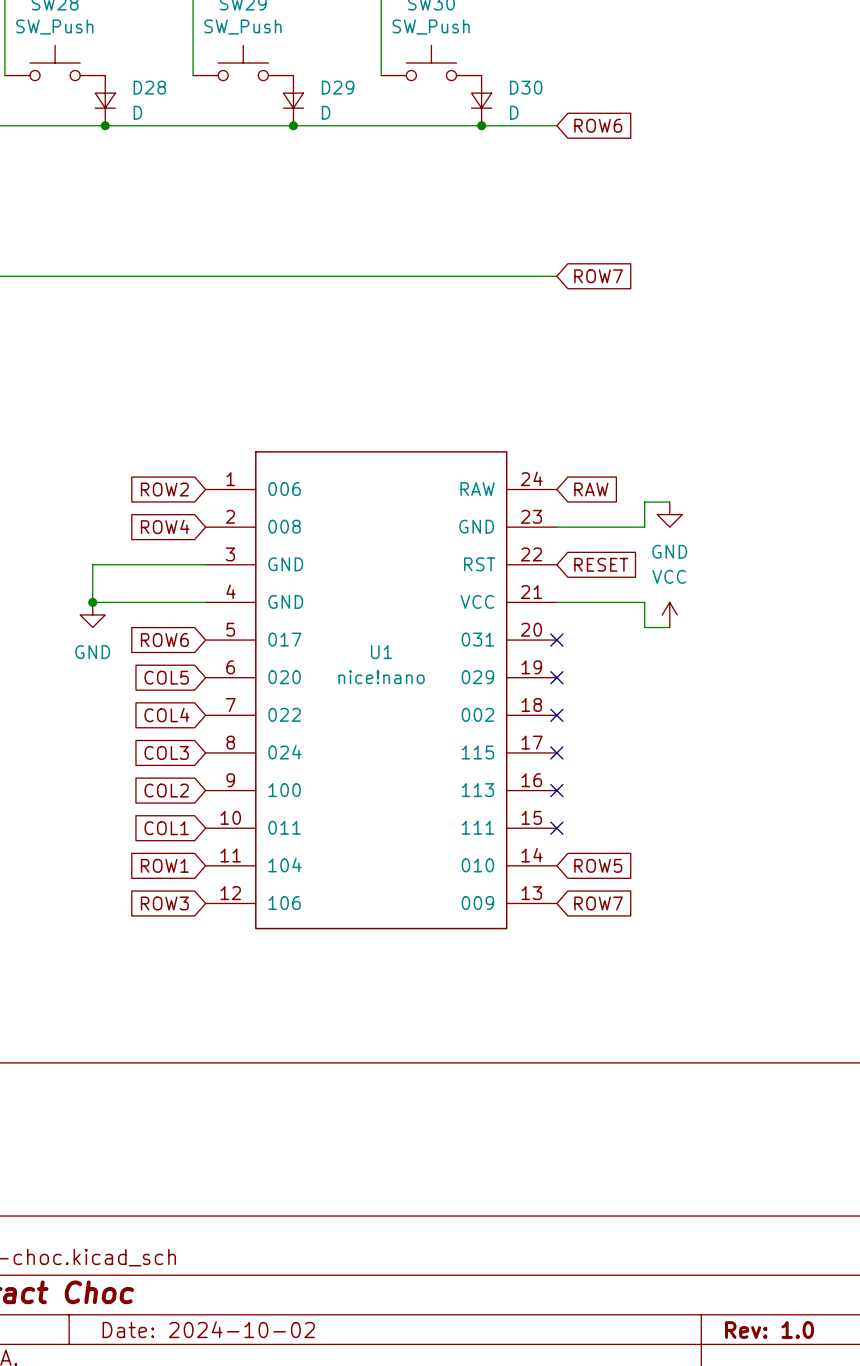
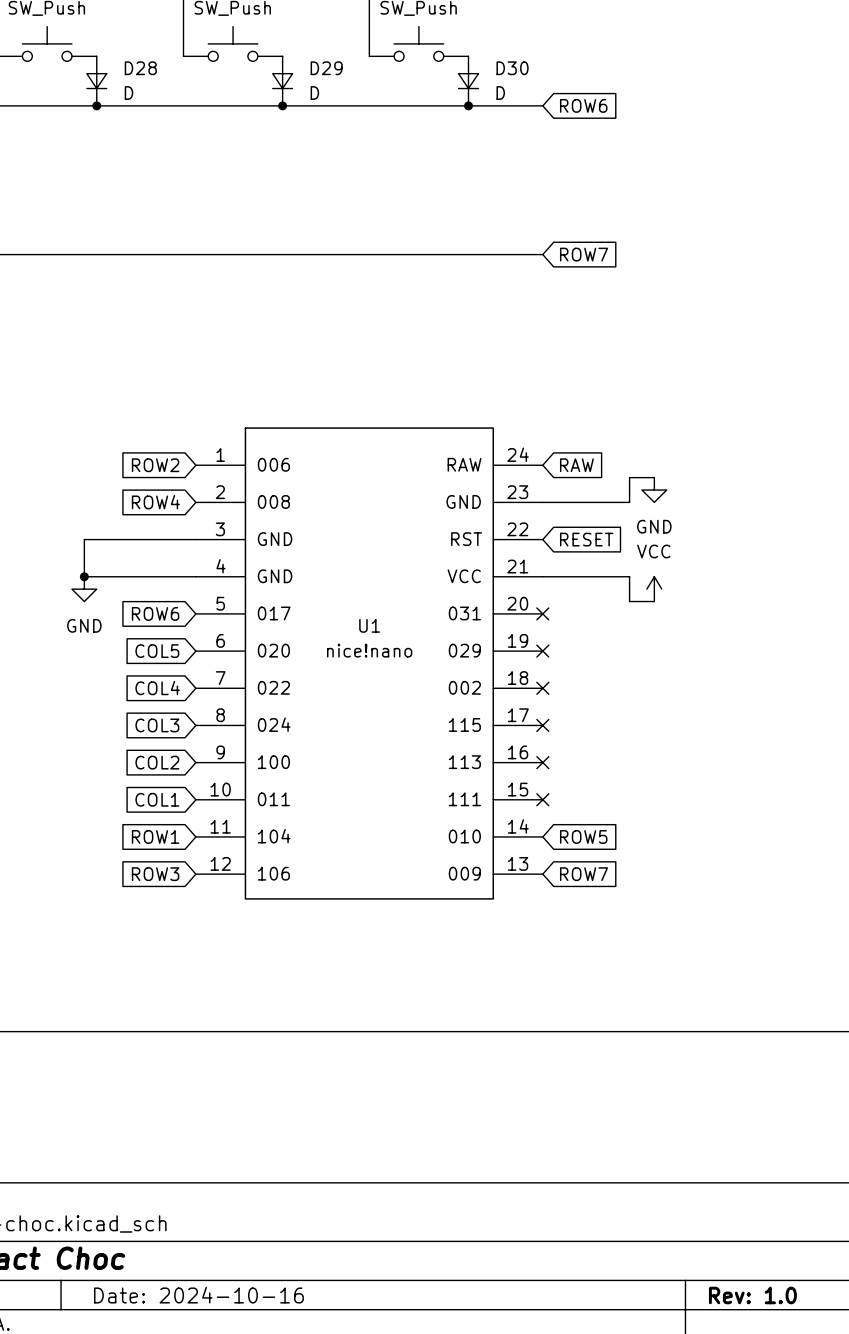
title block: Date: 2024-10-02 (208, 1329) -> Date: 2024-10-16 (198, 1295)

